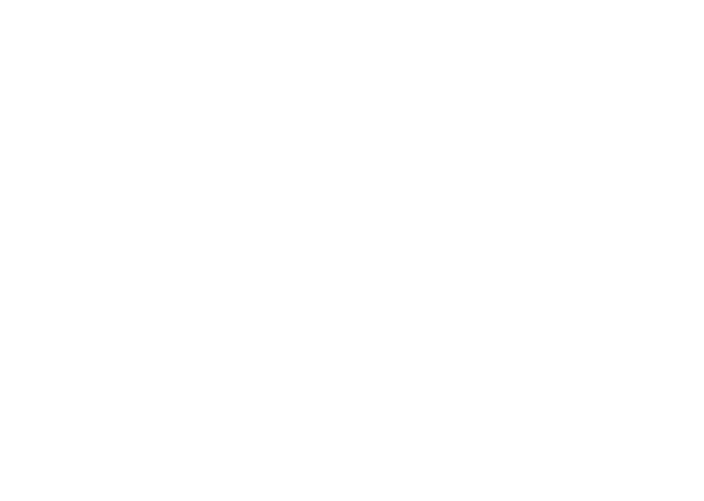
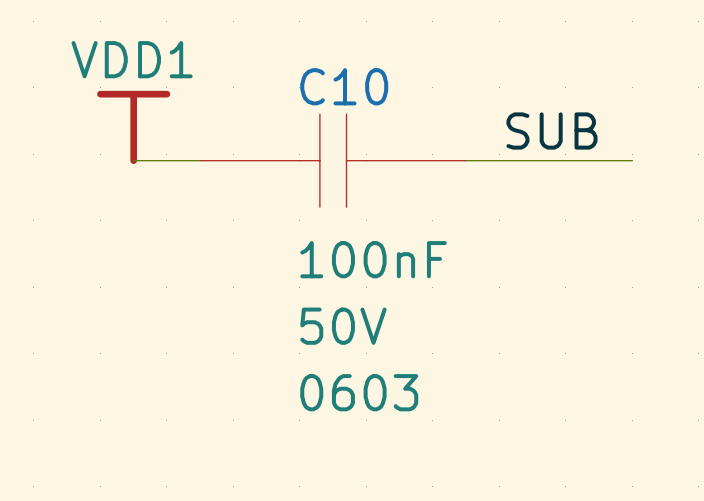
power symbol: none -> VDD1 (133, 127)
label: none -> SUB (551, 131)
wire: none -> (133, 160) (200, 160)
C10: none -> (333, 160)
wire: none -> (466, 160) (632, 160)

